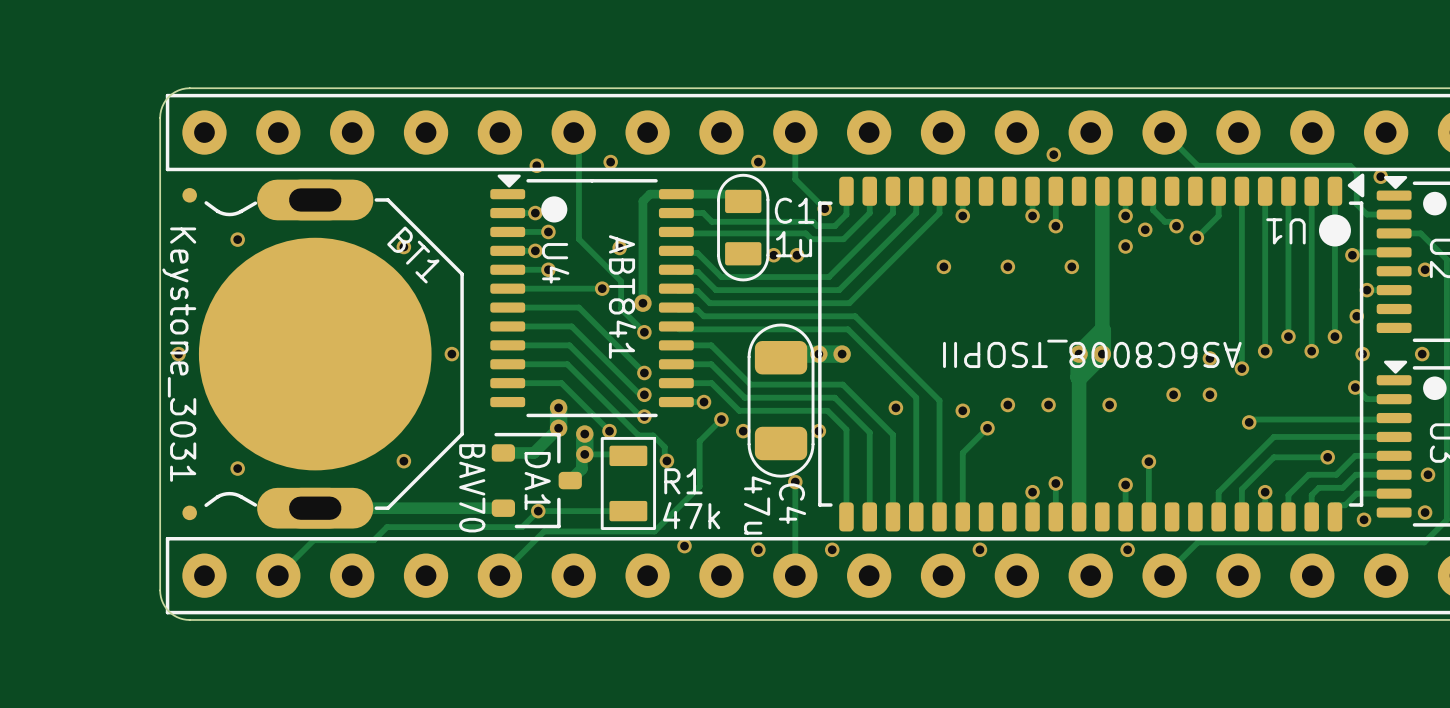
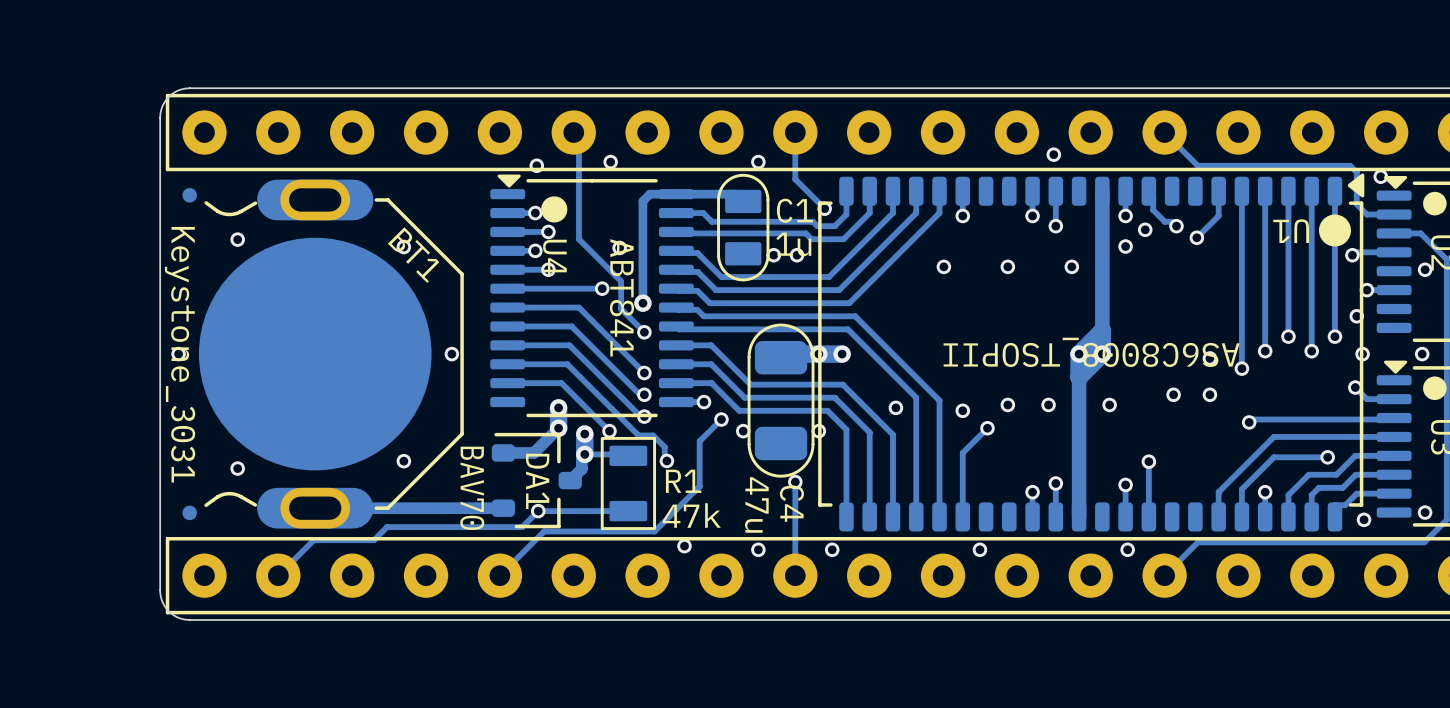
via: (1428, 474) -> none

